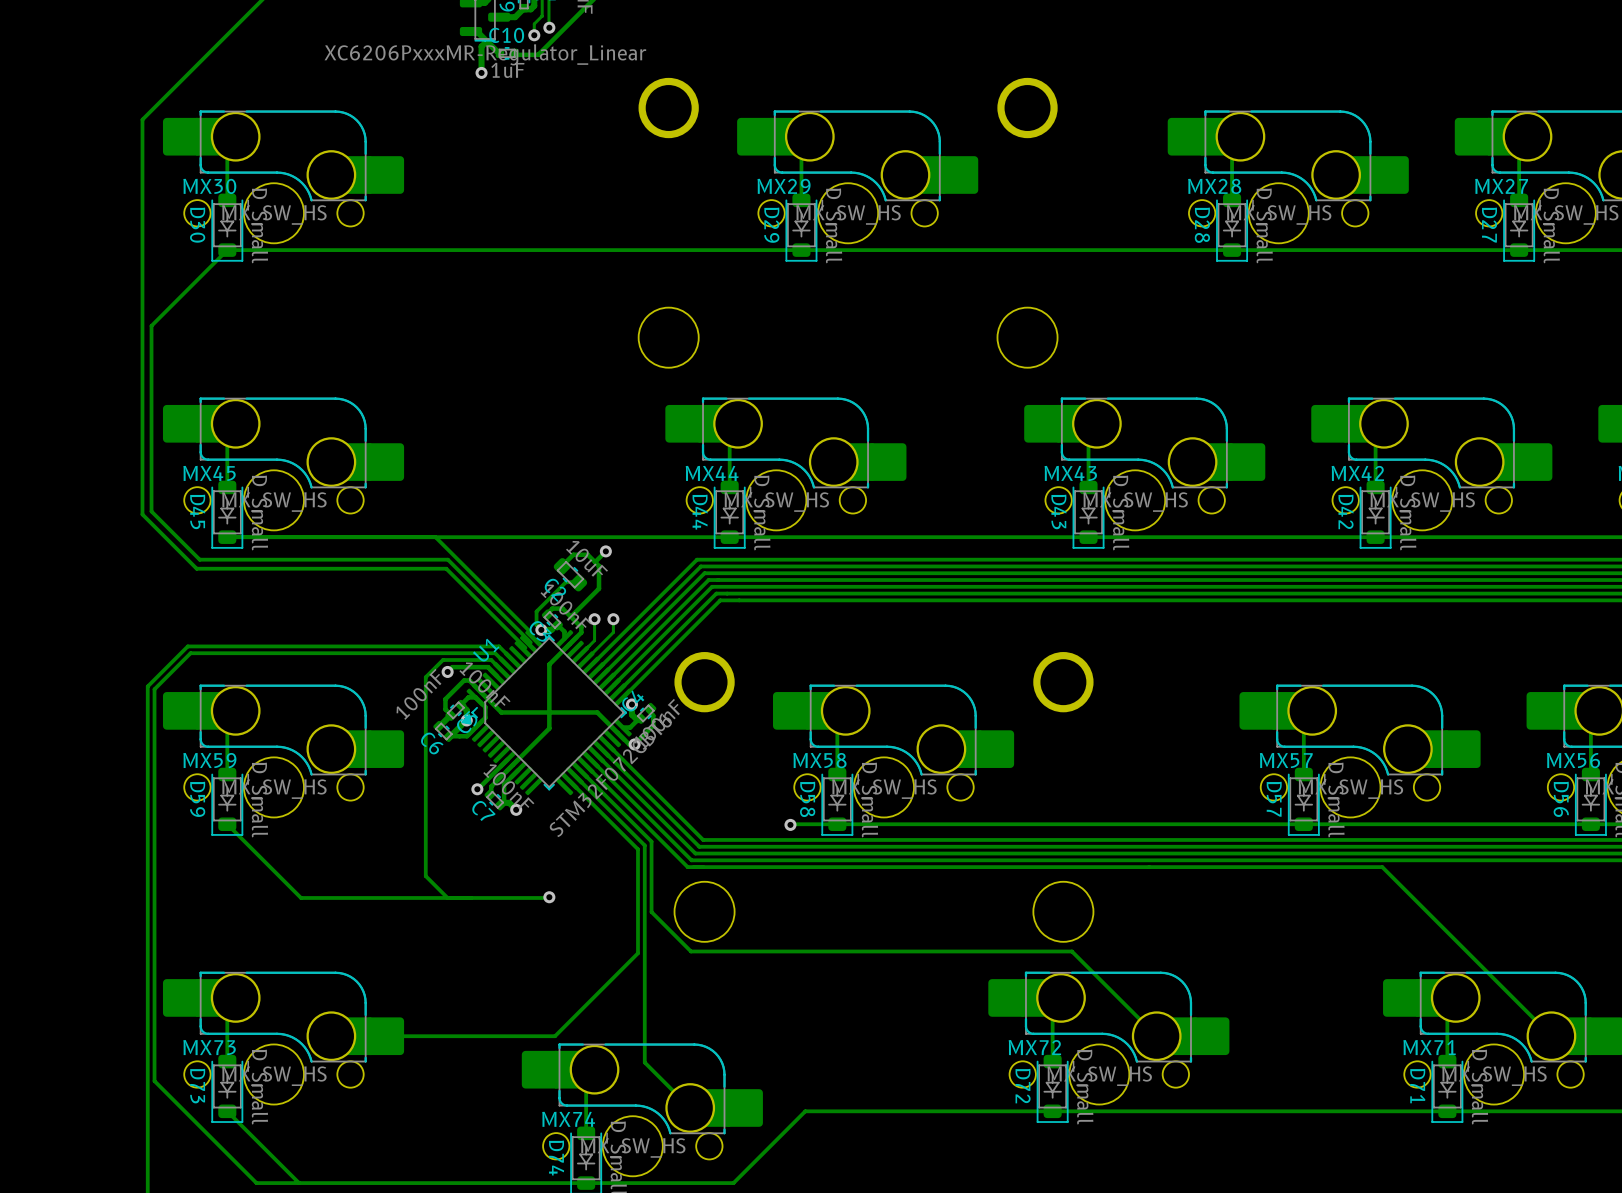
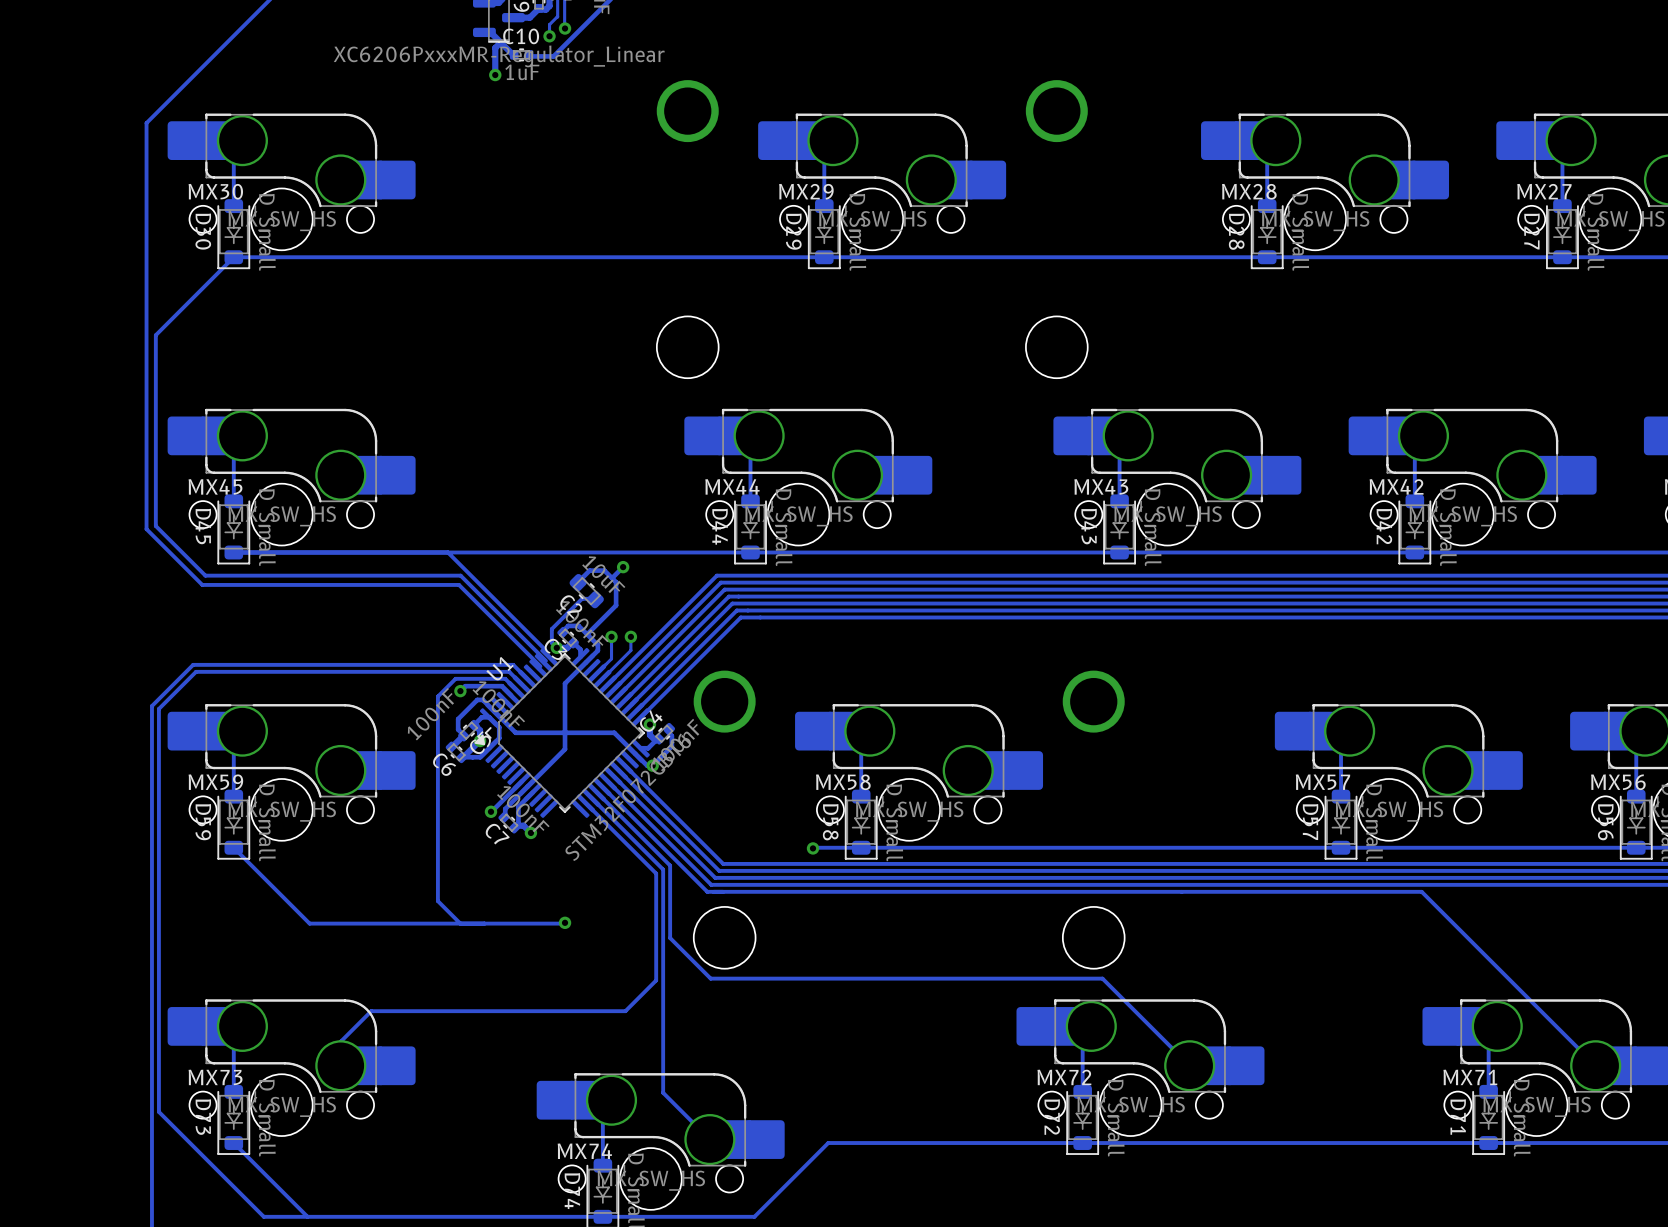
track: (608, 983) (555, 1036) (331, 1036) -> (625, 1011) (371, 1011) (340, 1041) (340, 1065)

